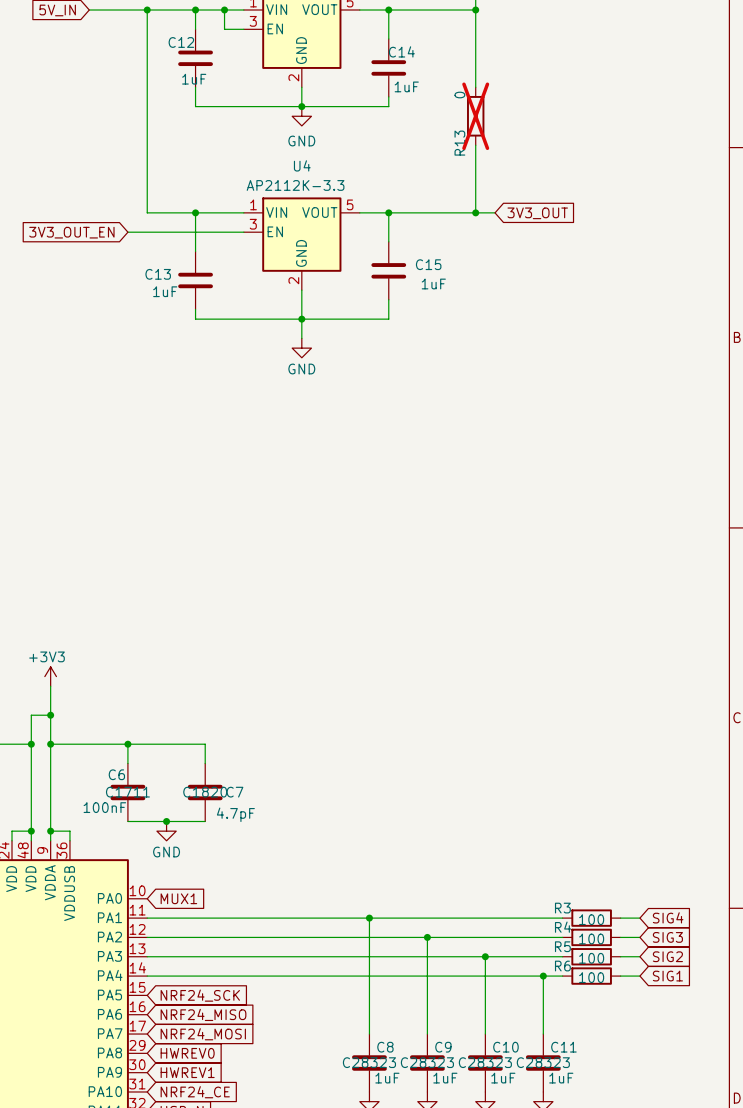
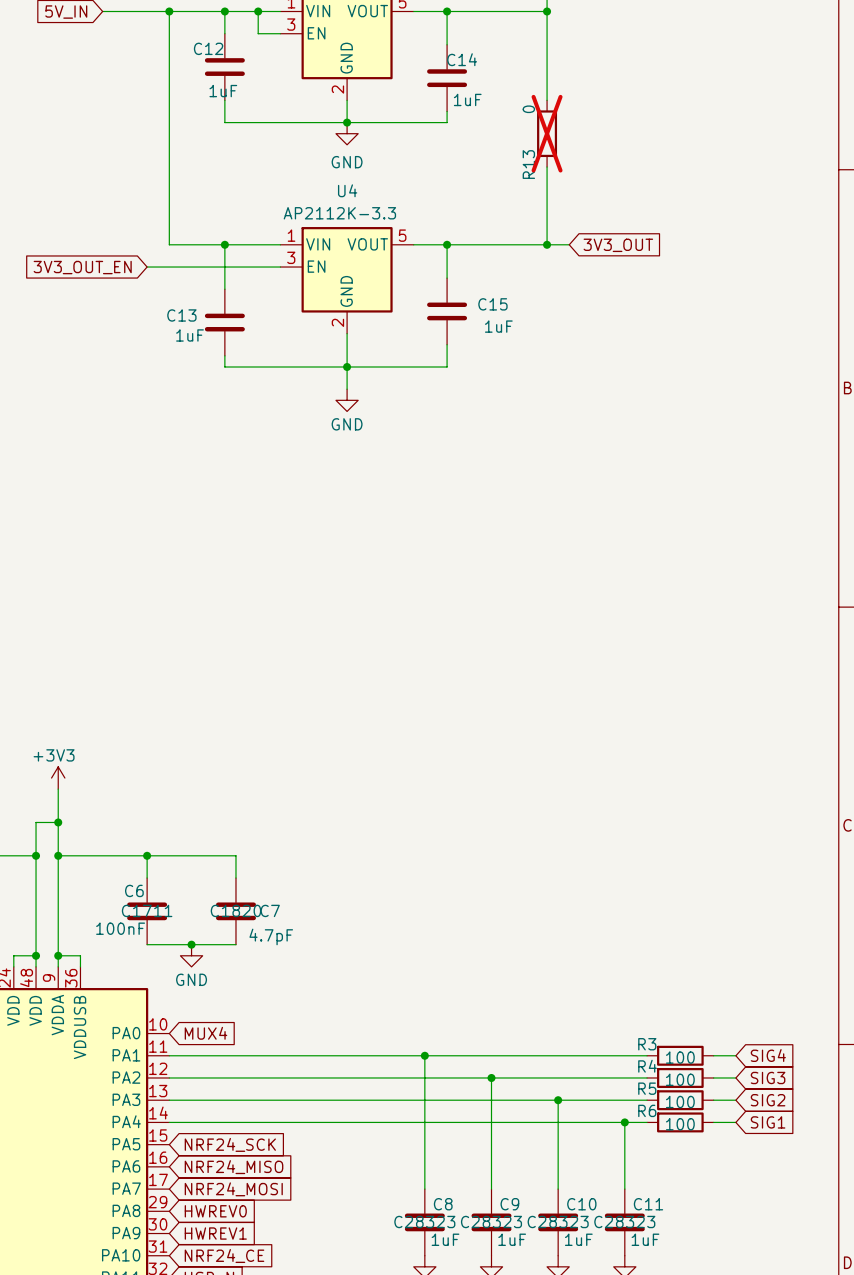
global label: MUX1 (178, 898) -> MUX4 (205, 1033)

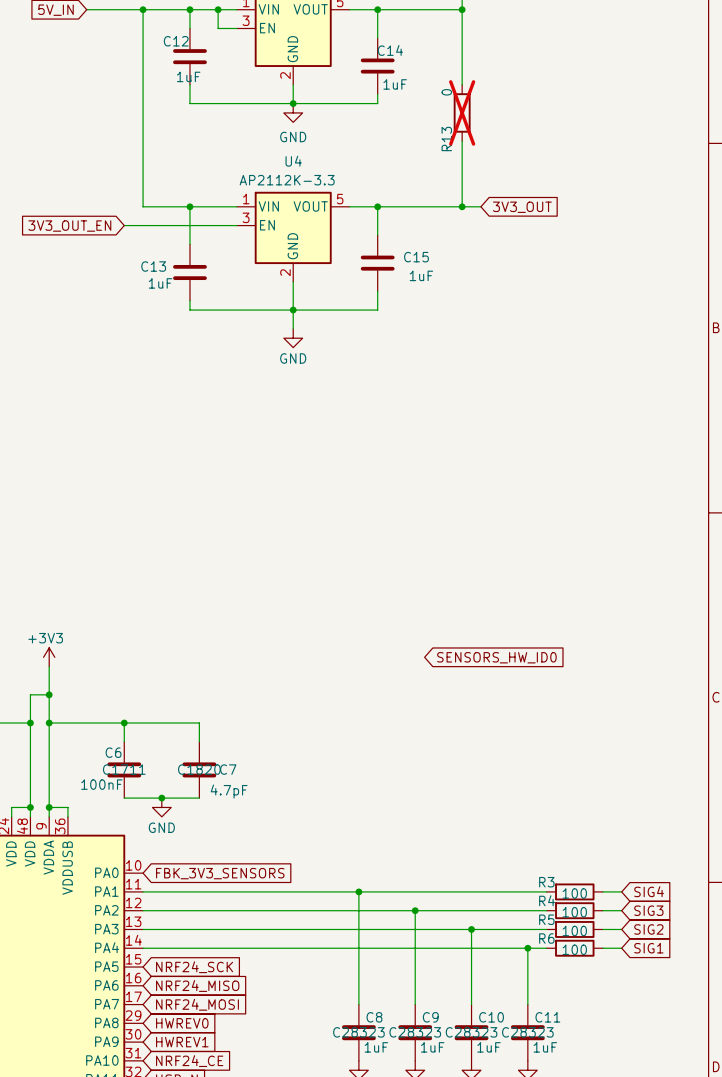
global label: none -> SENSORS_HW_ID0 (496, 657)
global label: MUX4 (205, 1033) -> FBK_3V3_SENSORS (220, 873)

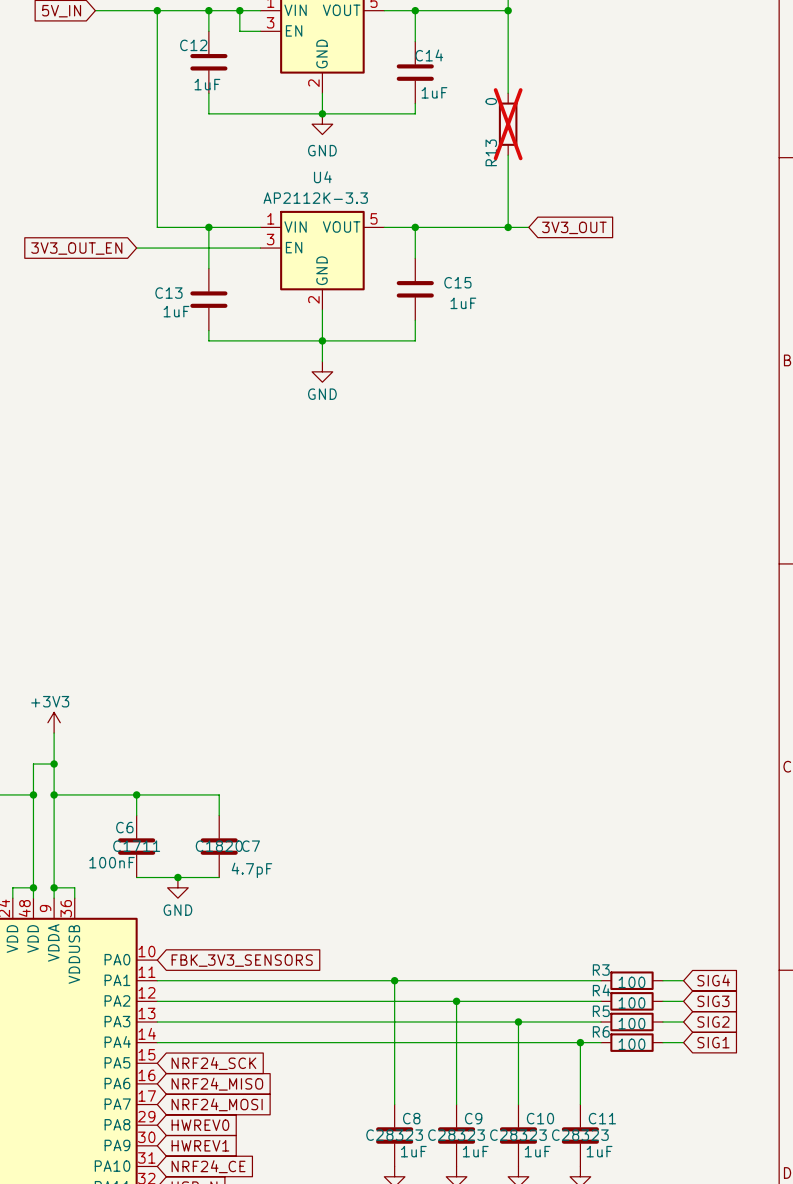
global label: SENSORS_HW_ID0 (496, 657) -> none

